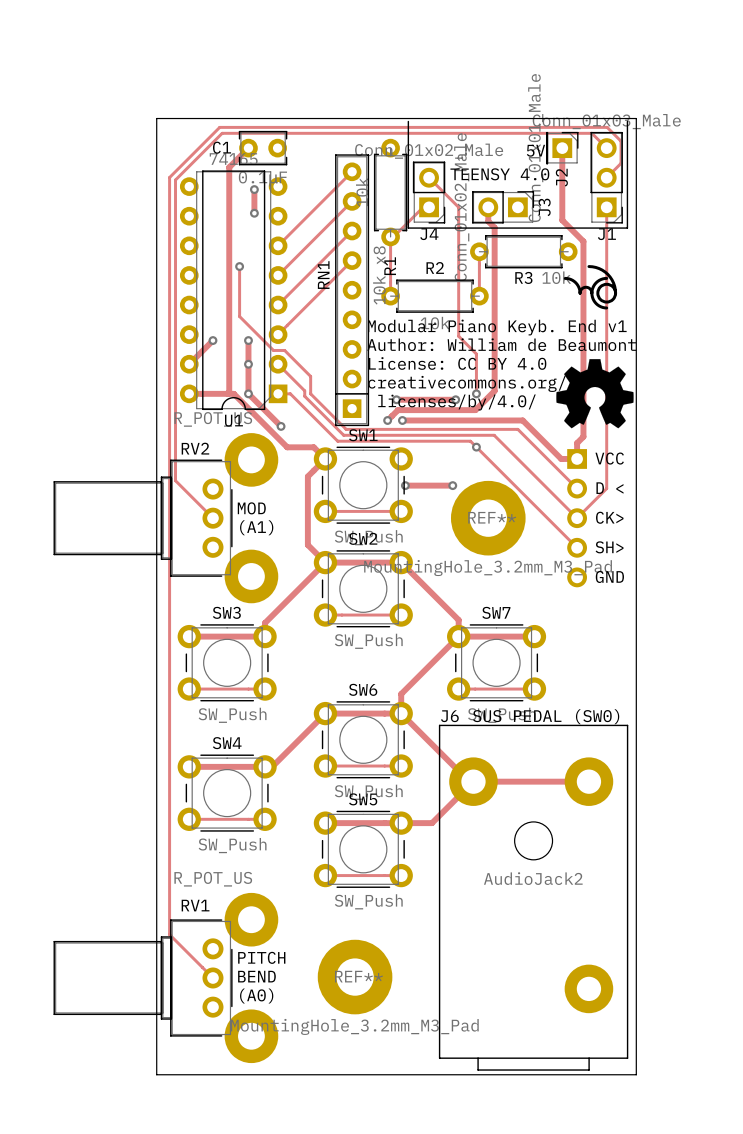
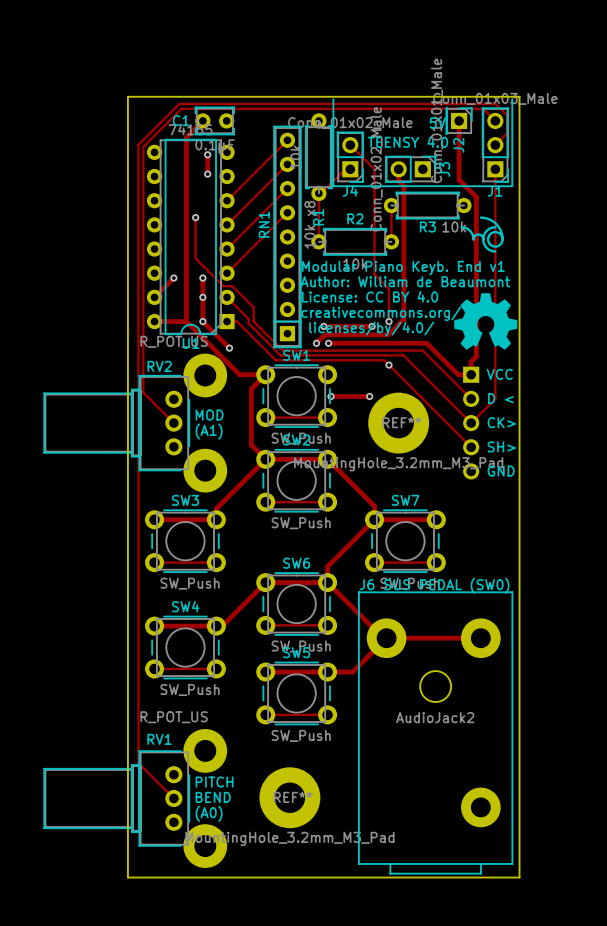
track: (229, 167) (227, 393) -> (187, 136) (186, 321) (239, 374) (265, 374)
track: (228, 393) (233, 393) (287, 447) (313, 447) (325, 458) -> none

